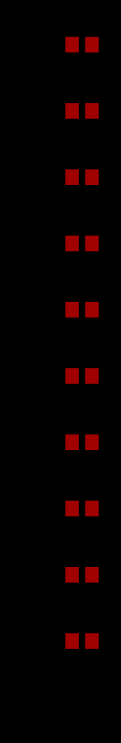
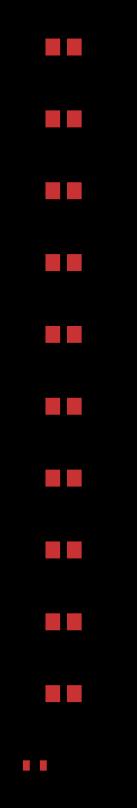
part: none -> (34, 765)

